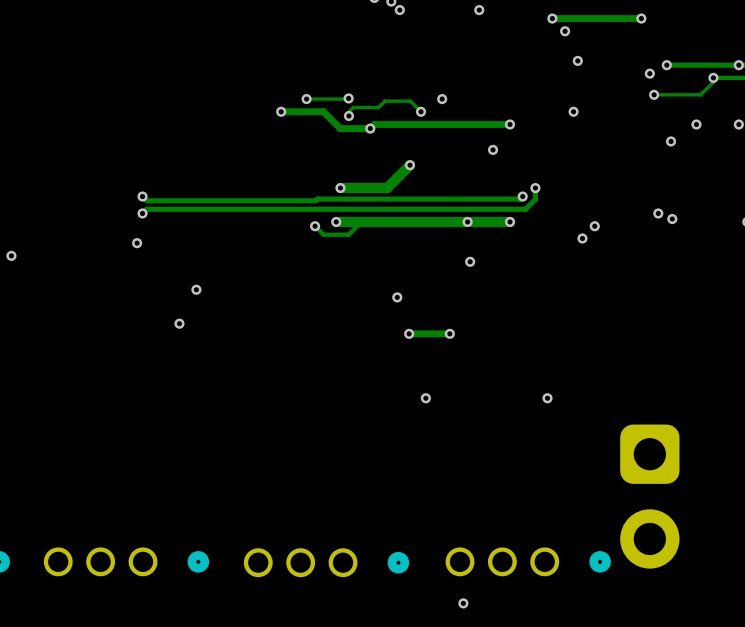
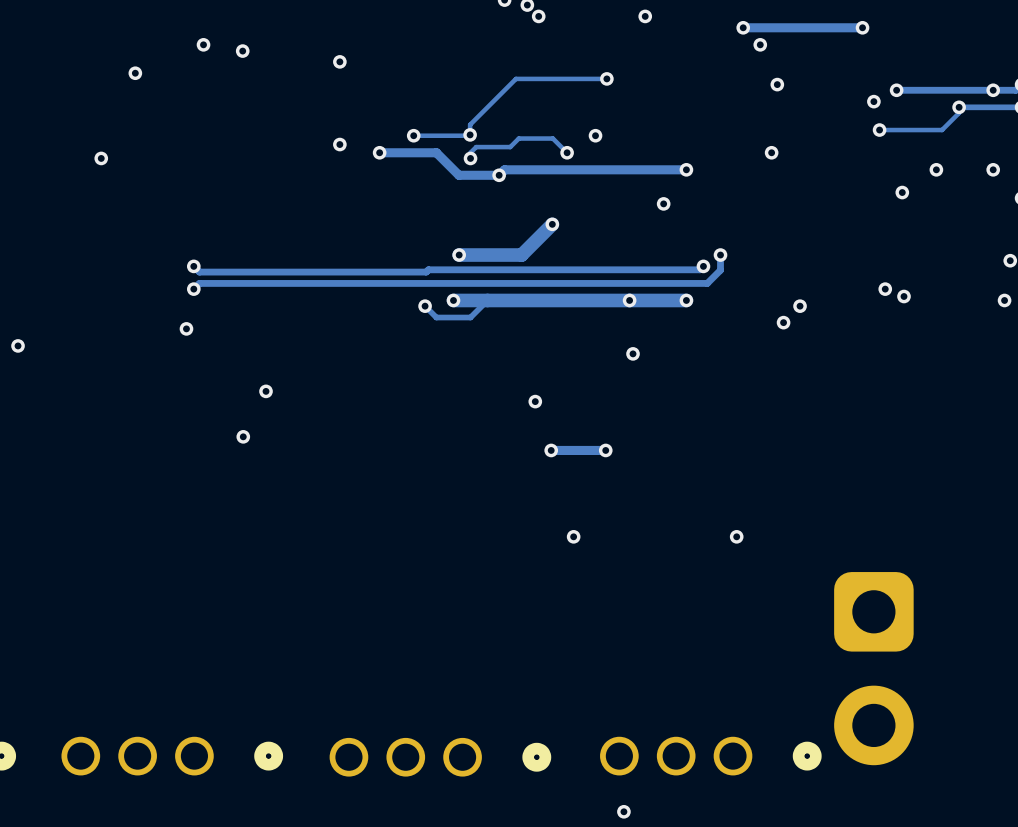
via: none -> (203, 44)
via: none -> (242, 51)
via: none -> (339, 61)
via: none -> (135, 73)
track: none -> (606, 78) (515, 78) (470, 124) (470, 134)
via: none -> (606, 78)
via: none -> (339, 144)
via: none -> (101, 158)

